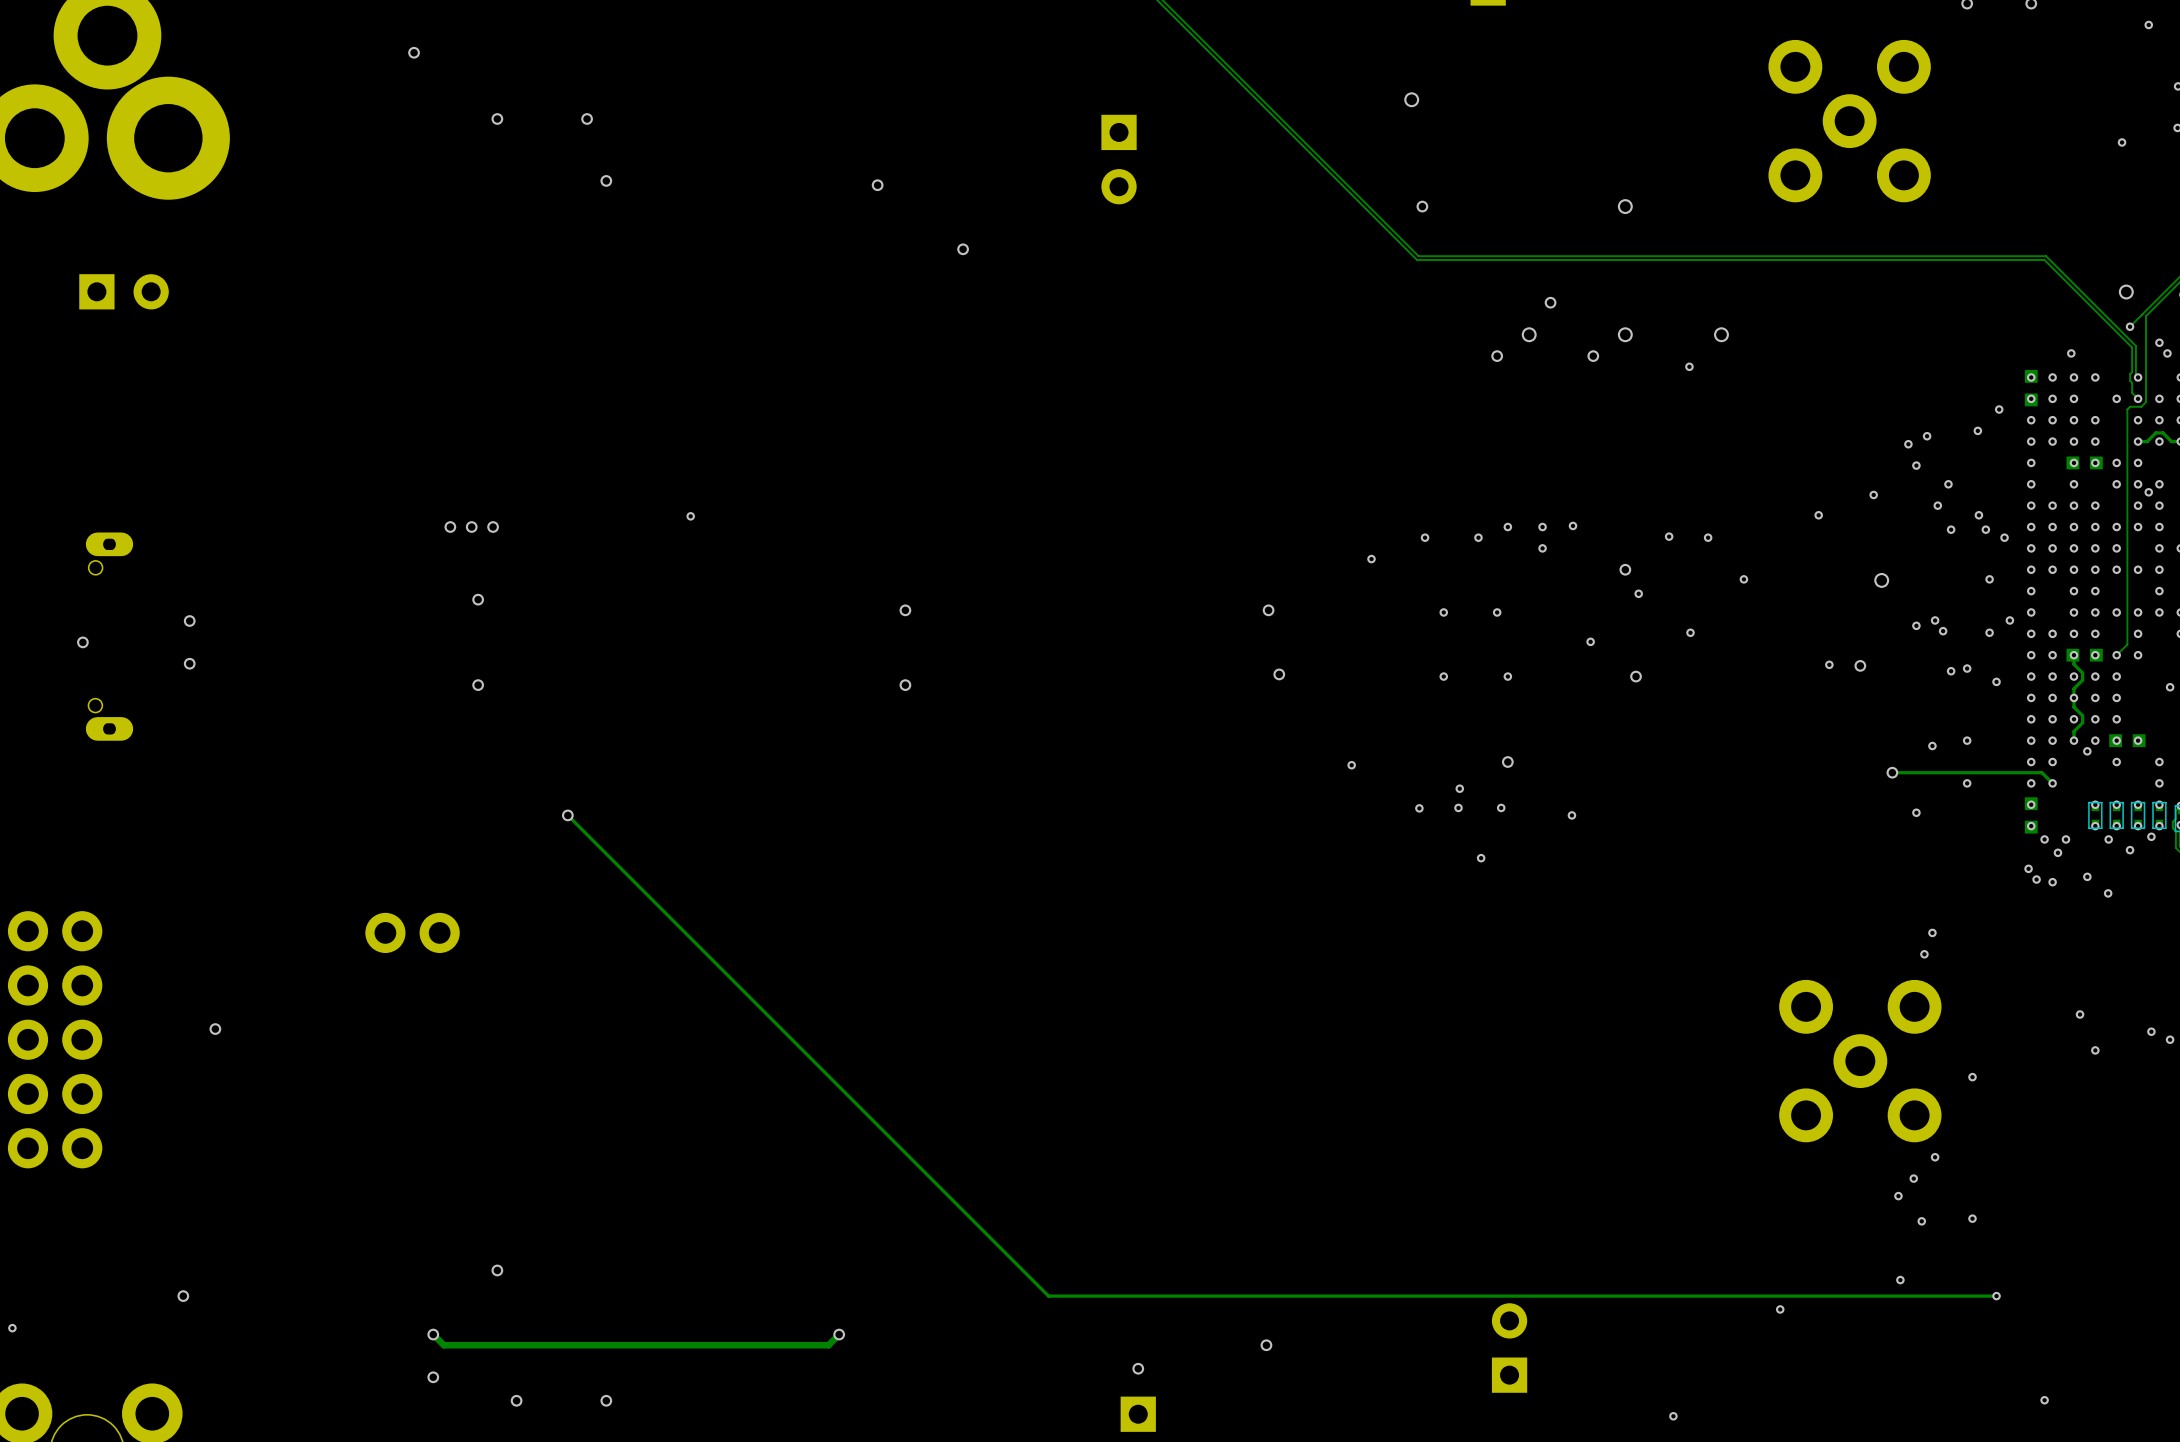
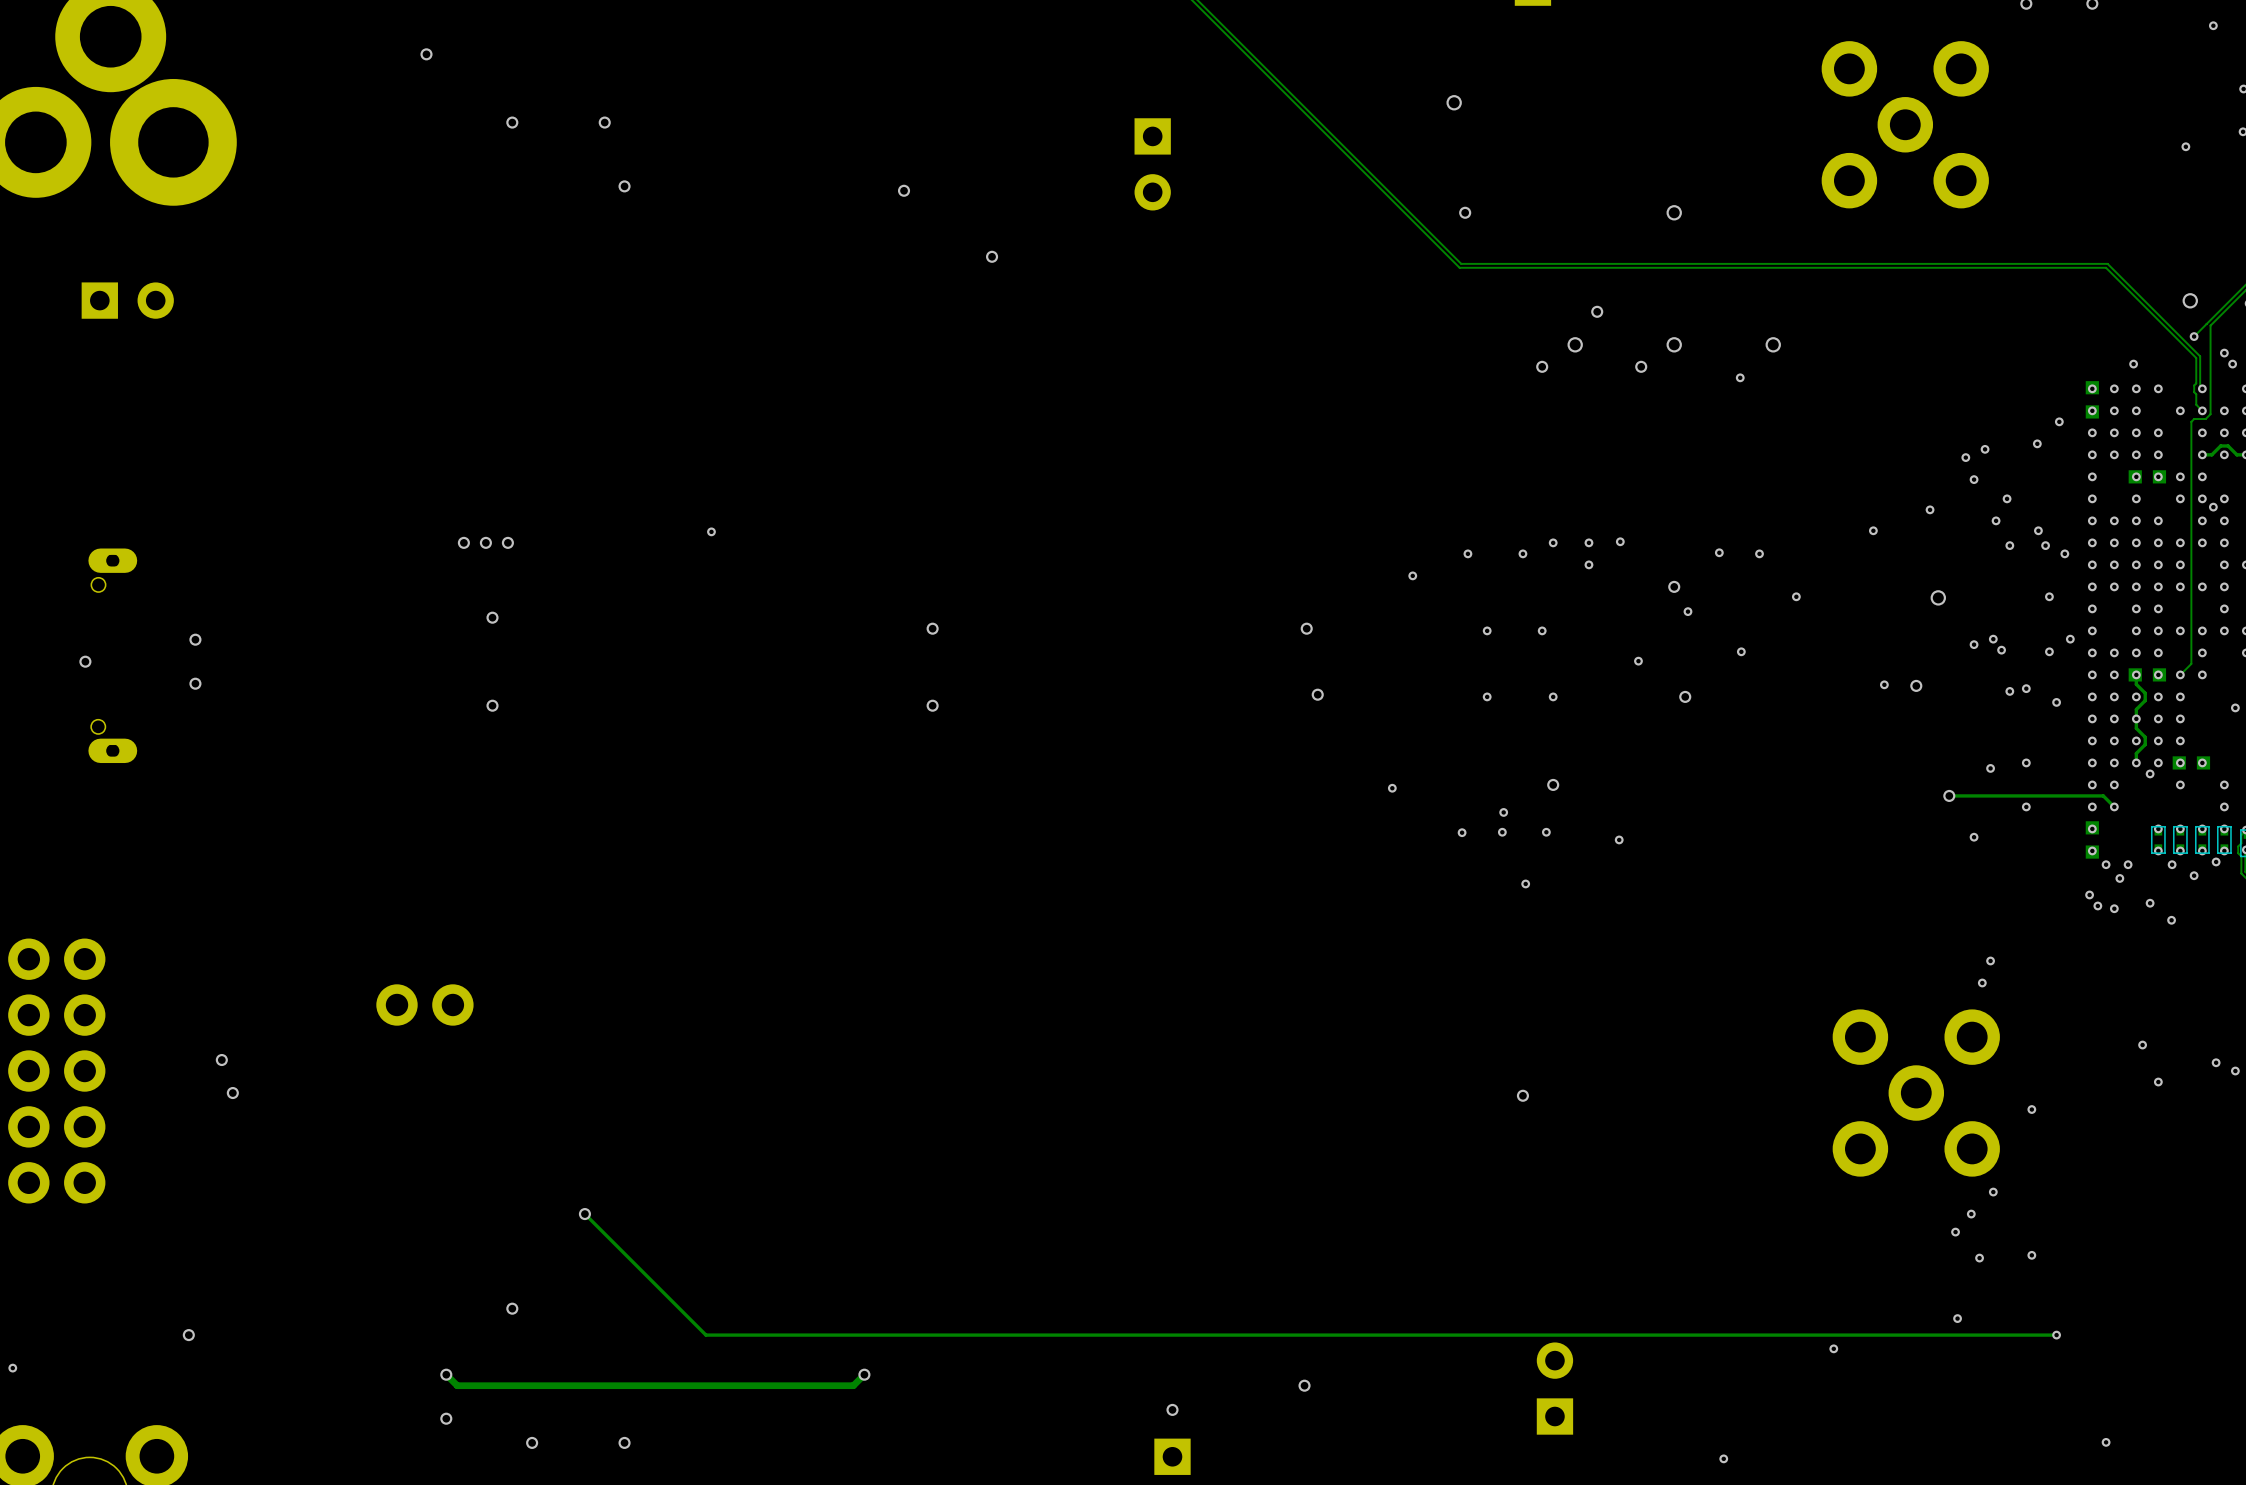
track: (567, 815) (1048, 1296) -> (584, 1214) (705, 1335) (1080, 1335)
via: (567, 815) -> none
part position: (412, 932) -> (424, 1004)
via: none -> (232, 1093)
via: none -> (1522, 1095)
via: none -> (584, 1214)

